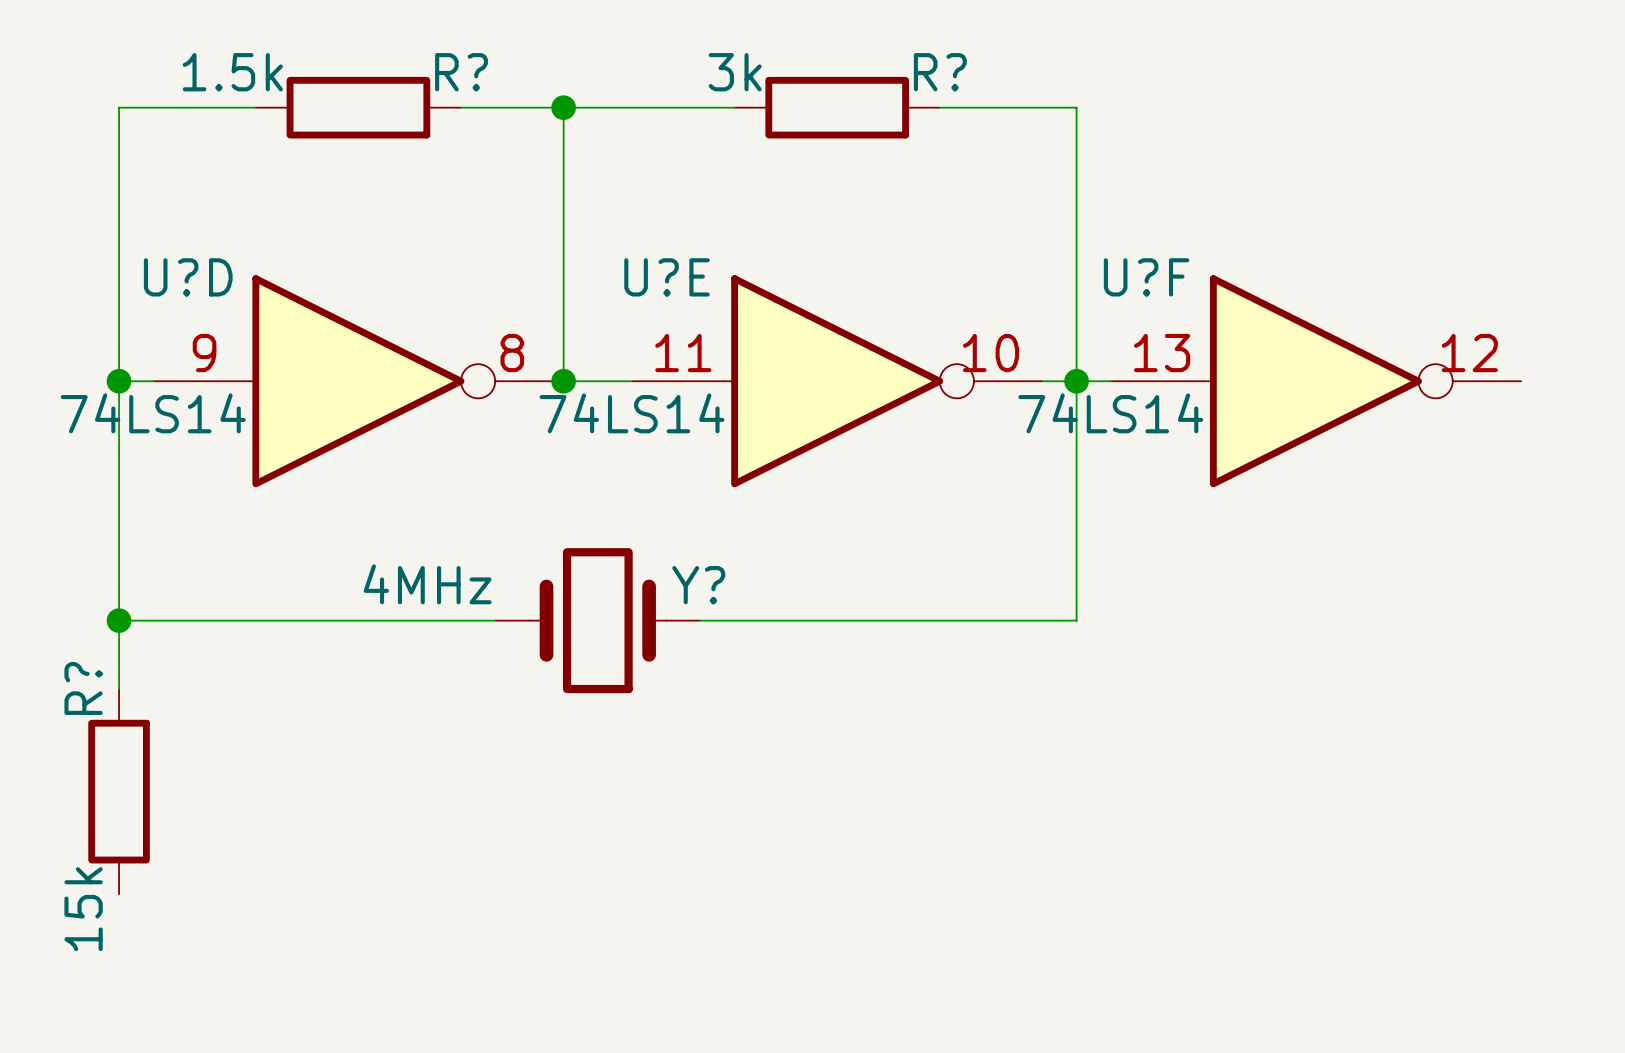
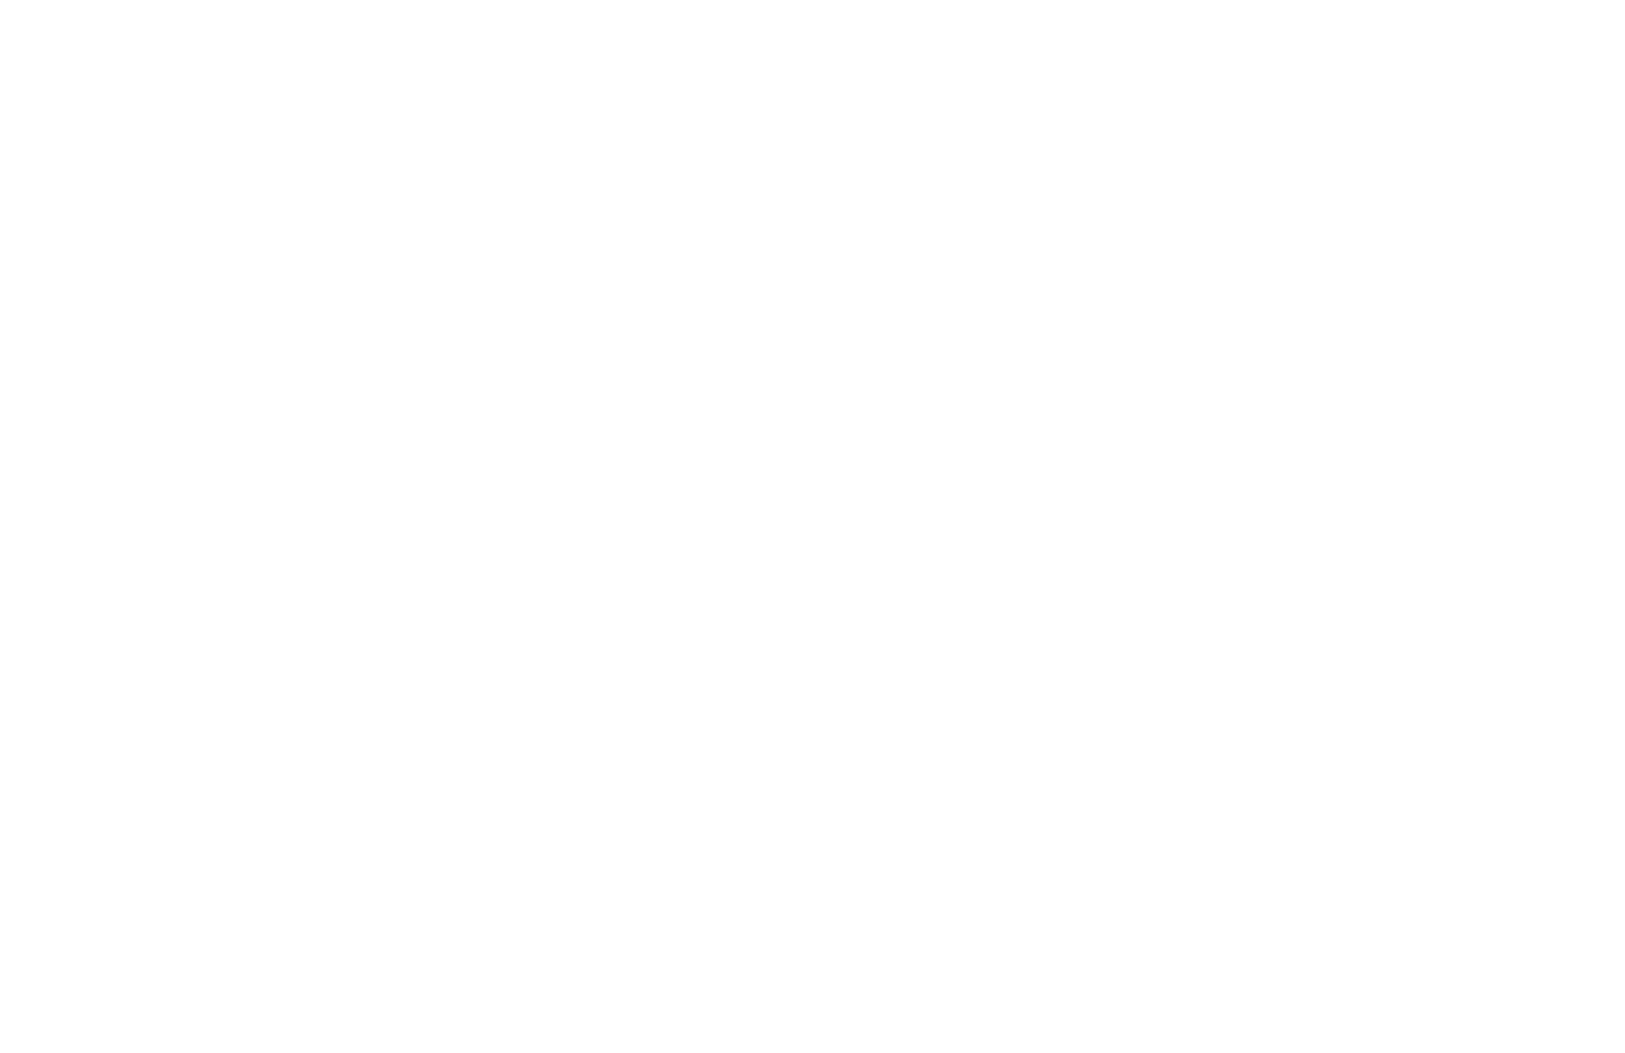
wire: (255, 107) (119, 107) (119, 689) -> none
R?: 1.5k (358, 107) -> none
wire: (461, 107) (734, 107) -> none
wire: (563, 107) (563, 381) (632, 381) -> none
junction: (563, 107) -> none
R?: 3k (837, 107) -> none
wire: (939, 107) (1076, 107) (1076, 620) (700, 620) -> none
wire: (119, 381) (153, 381) -> none
junction: (119, 381) -> none
U?D: 74LS14 (358, 381) -> none
junction: (563, 381) -> none
U?E: 74LS14 (837, 381) -> none
wire: (1042, 381) (1110, 381) -> none
junction: (1076, 381) -> none
U?F: 74LS14 (1315, 381) -> none
wire: (119, 620) (495, 620) -> none
junction: (119, 620) -> none
Y?: 4MHz (597, 620) -> none
R?: 15k (119, 791) -> none

